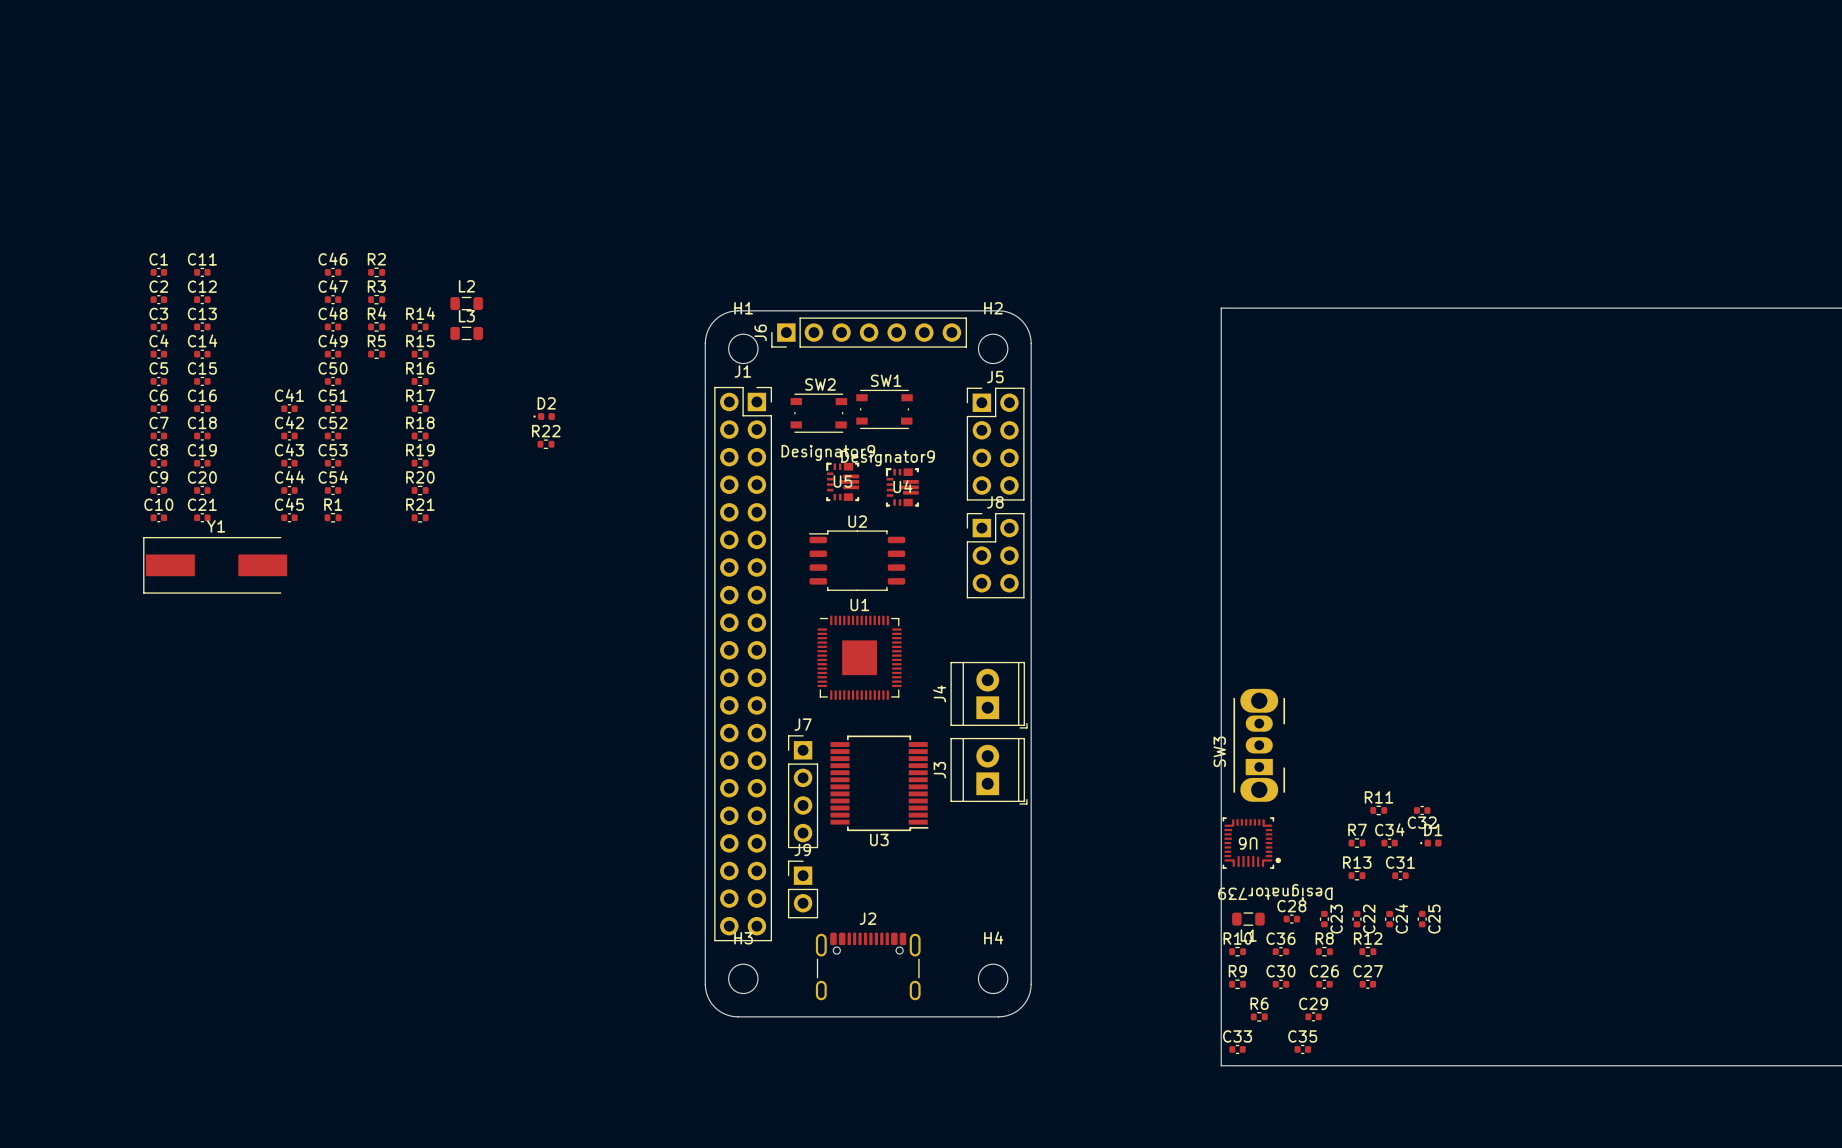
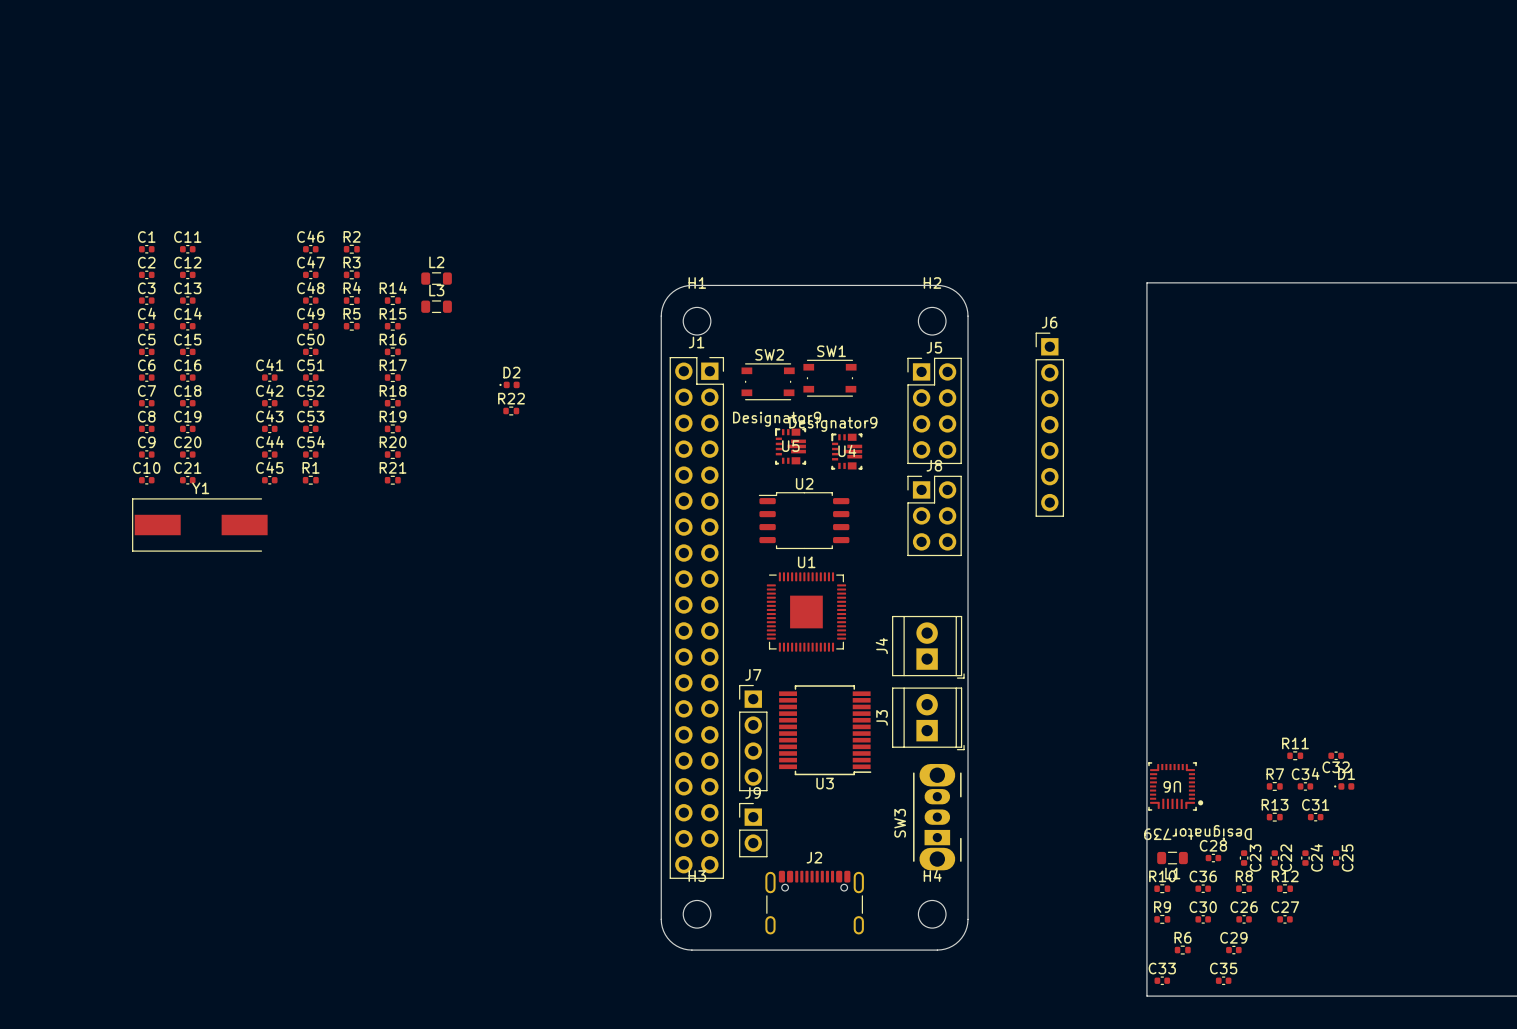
J6 rotation: 0° (869, 332) -> 90° clockwise (1049, 424)
J6 position: (869, 332) -> (1049, 424)
SW3 position: (1259, 745) -> (937, 817)

